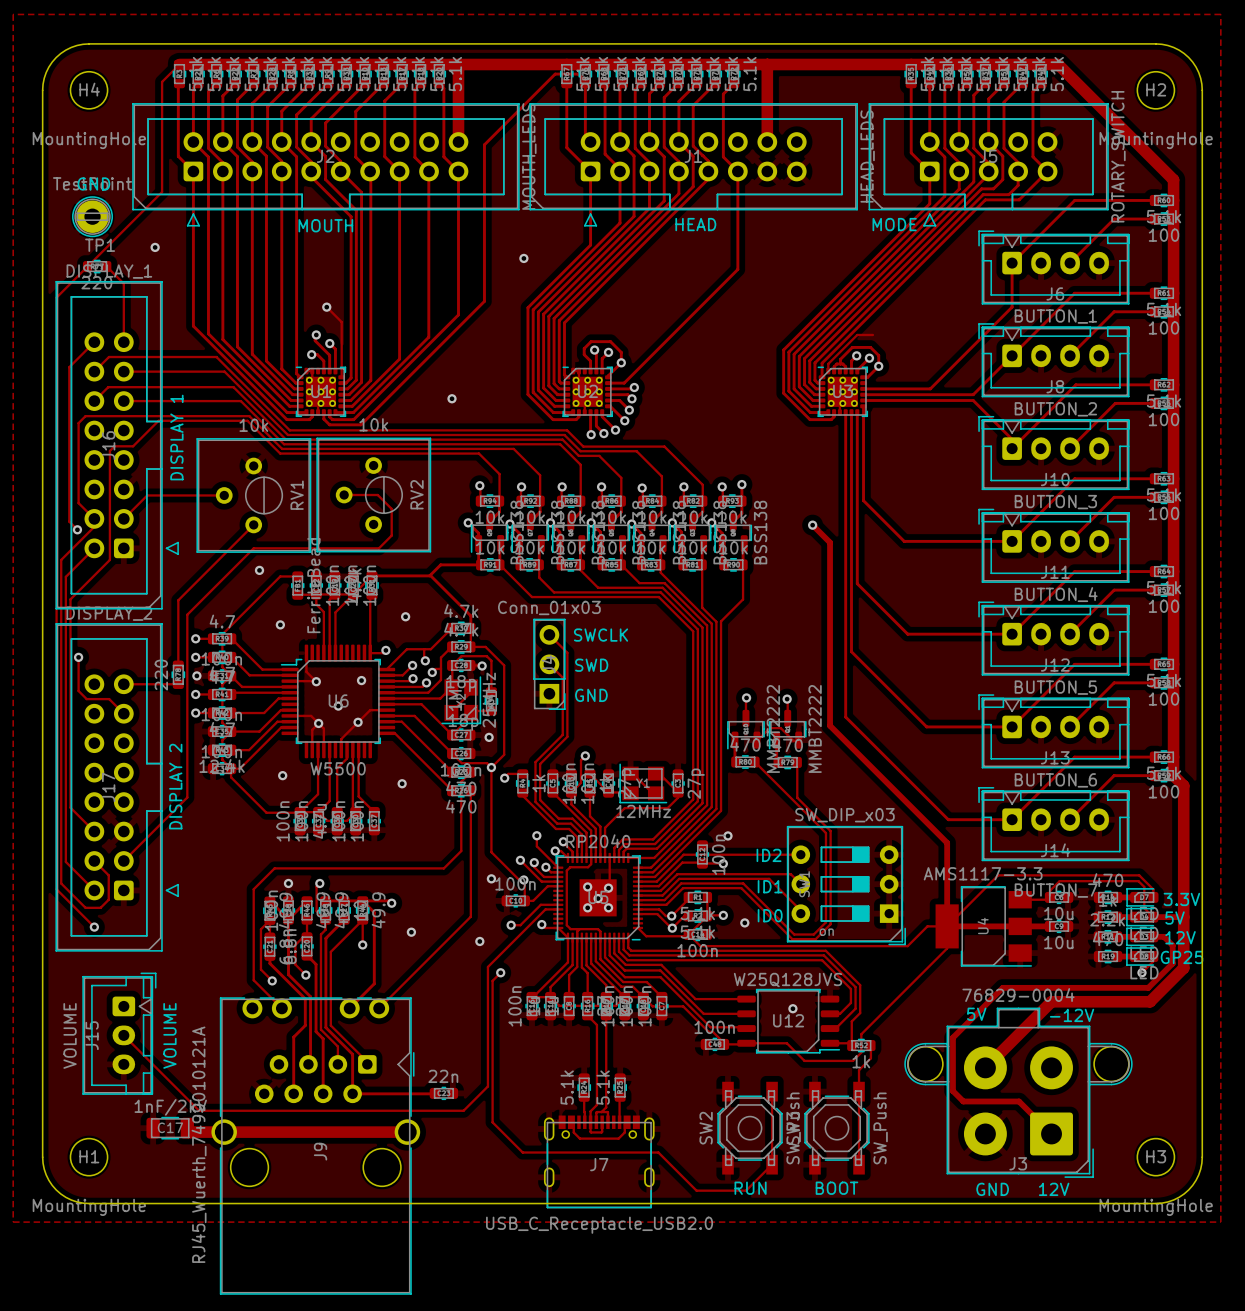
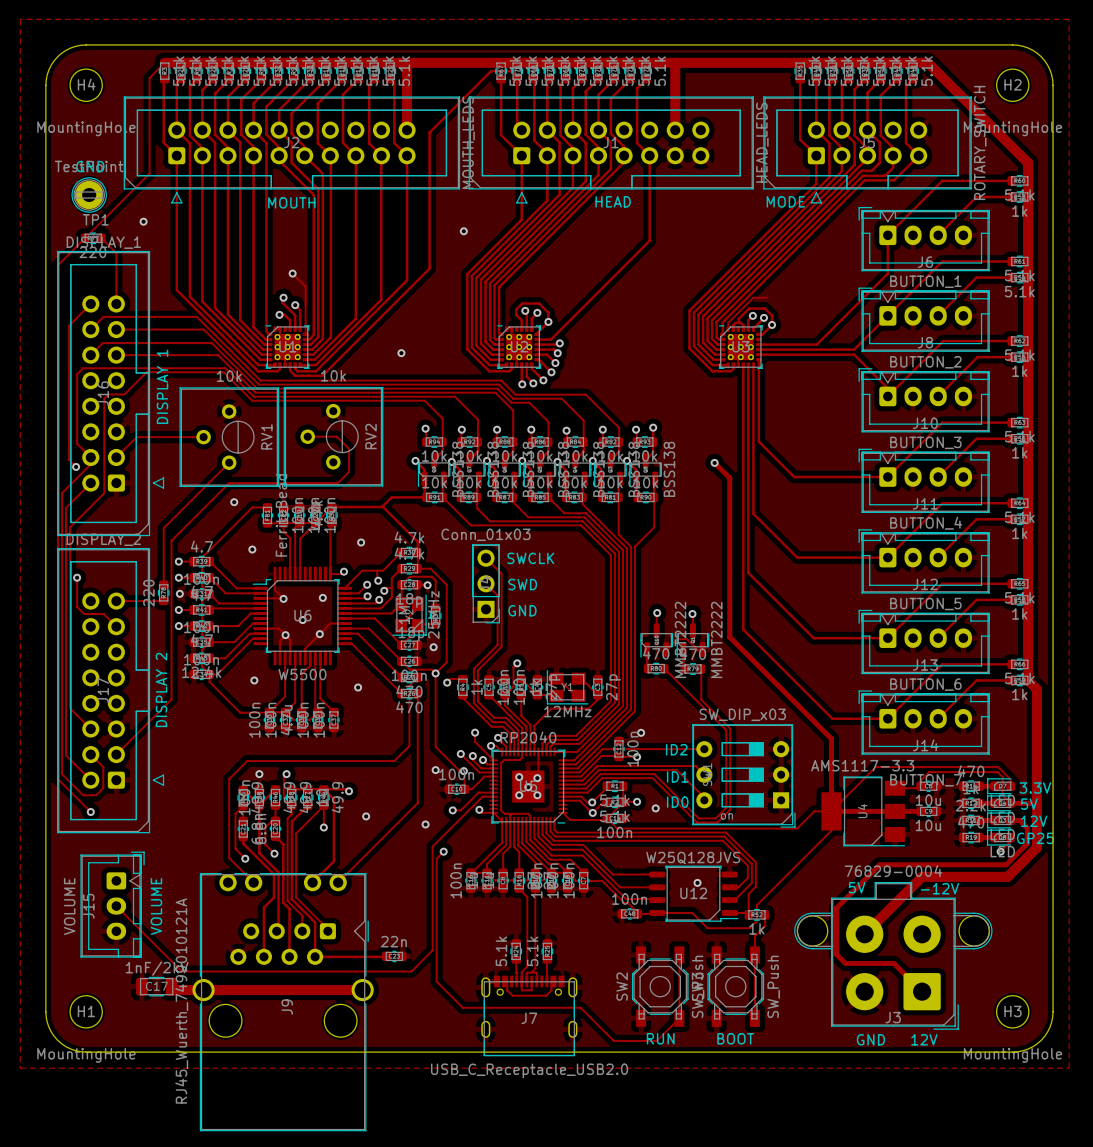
part value: 100 (1164, 235) -> 1k (1019, 211)
part value: 100 (1164, 327) -> 5.1k (1019, 291)
part value: 100 (1164, 419) -> 1k (1019, 371)
part value: 100 (1164, 513) -> 1k (1019, 452)
part value: 100 (1164, 606) -> 1k (1019, 533)
part value: 100 (1164, 699) -> 1k (1019, 613)
part value: 100 (1164, 791) -> 1k (1019, 694)

